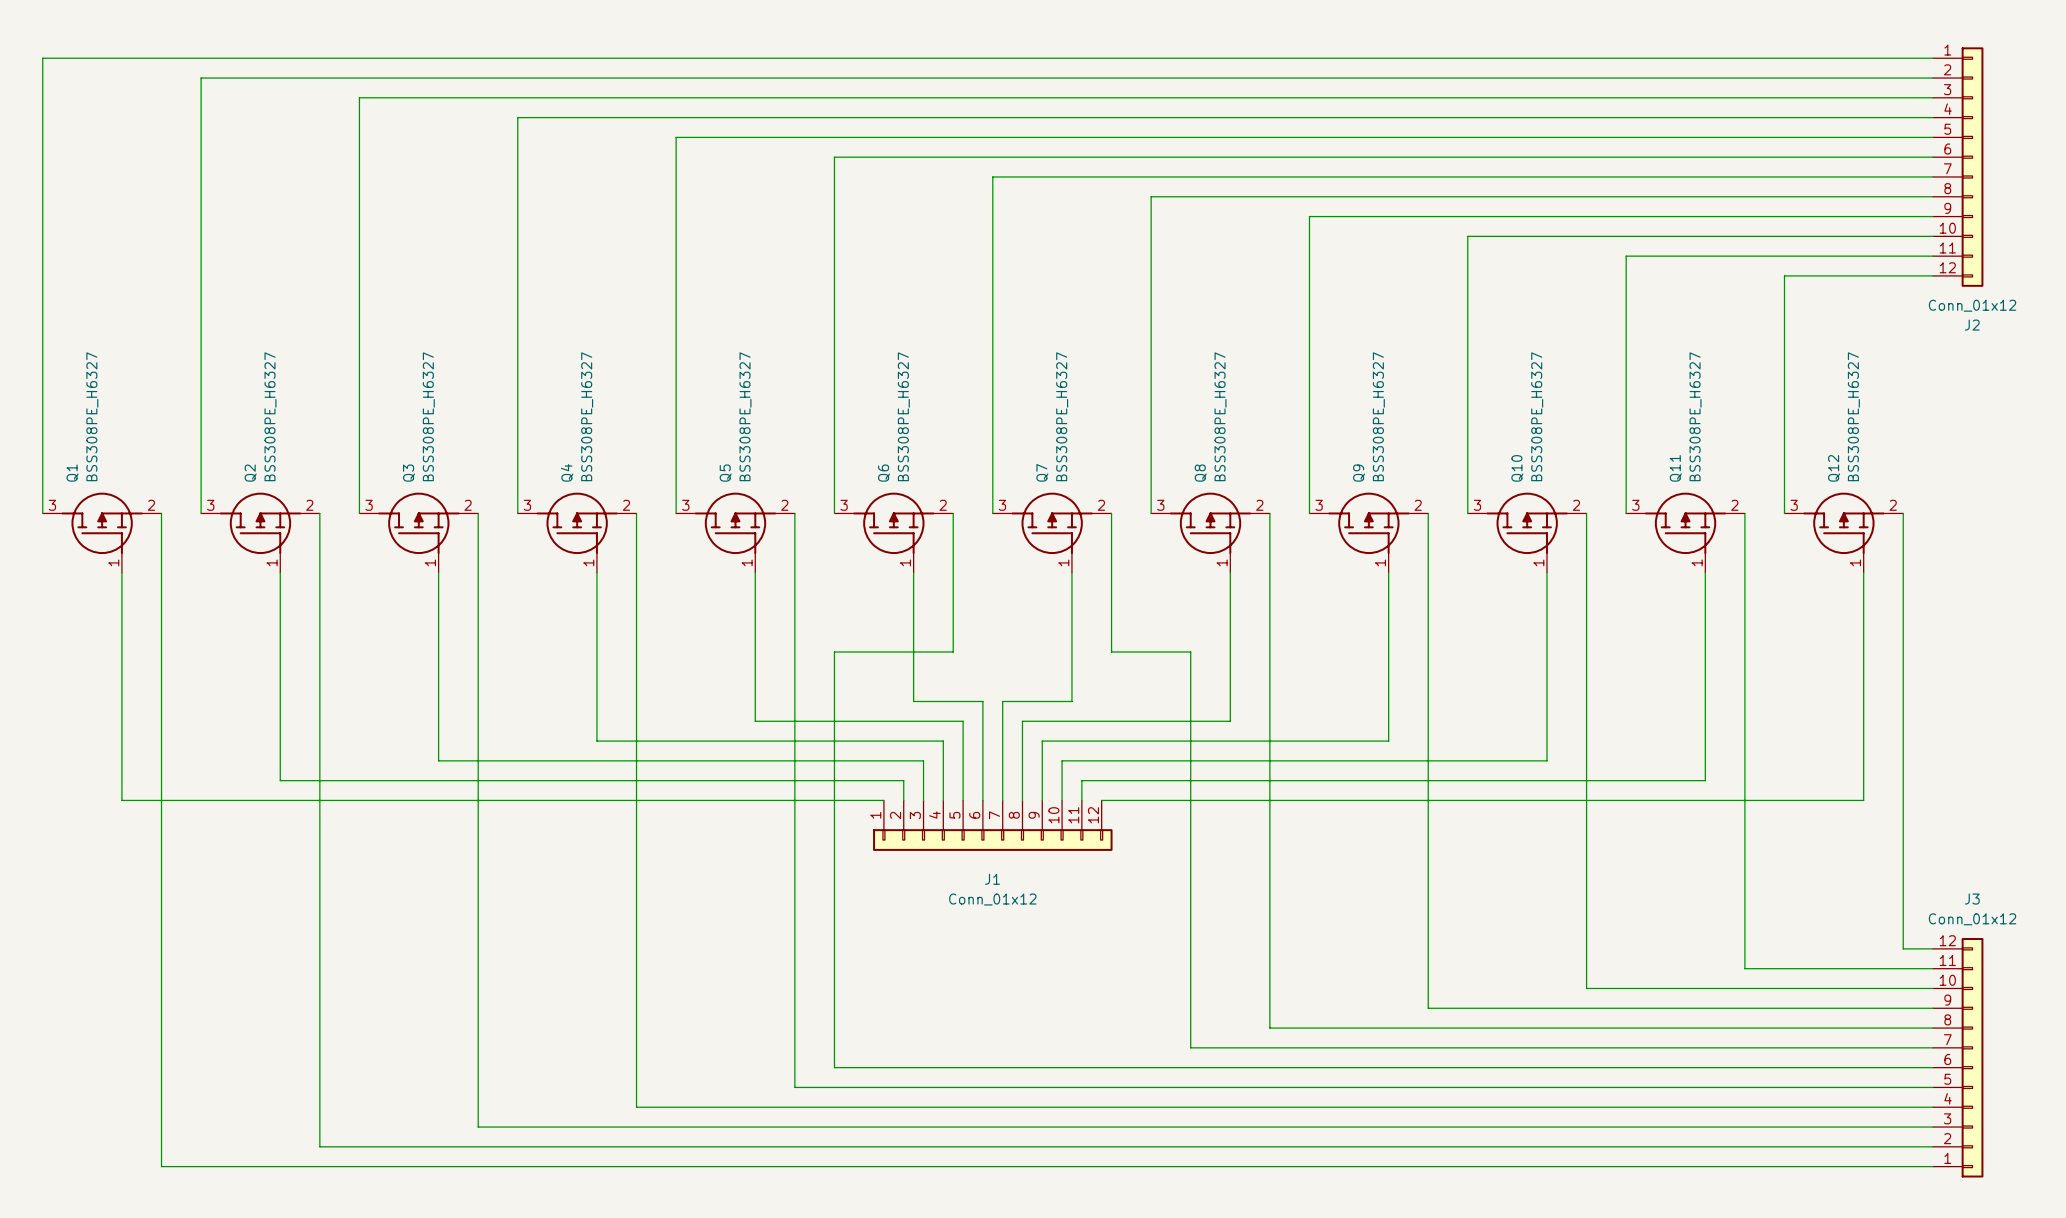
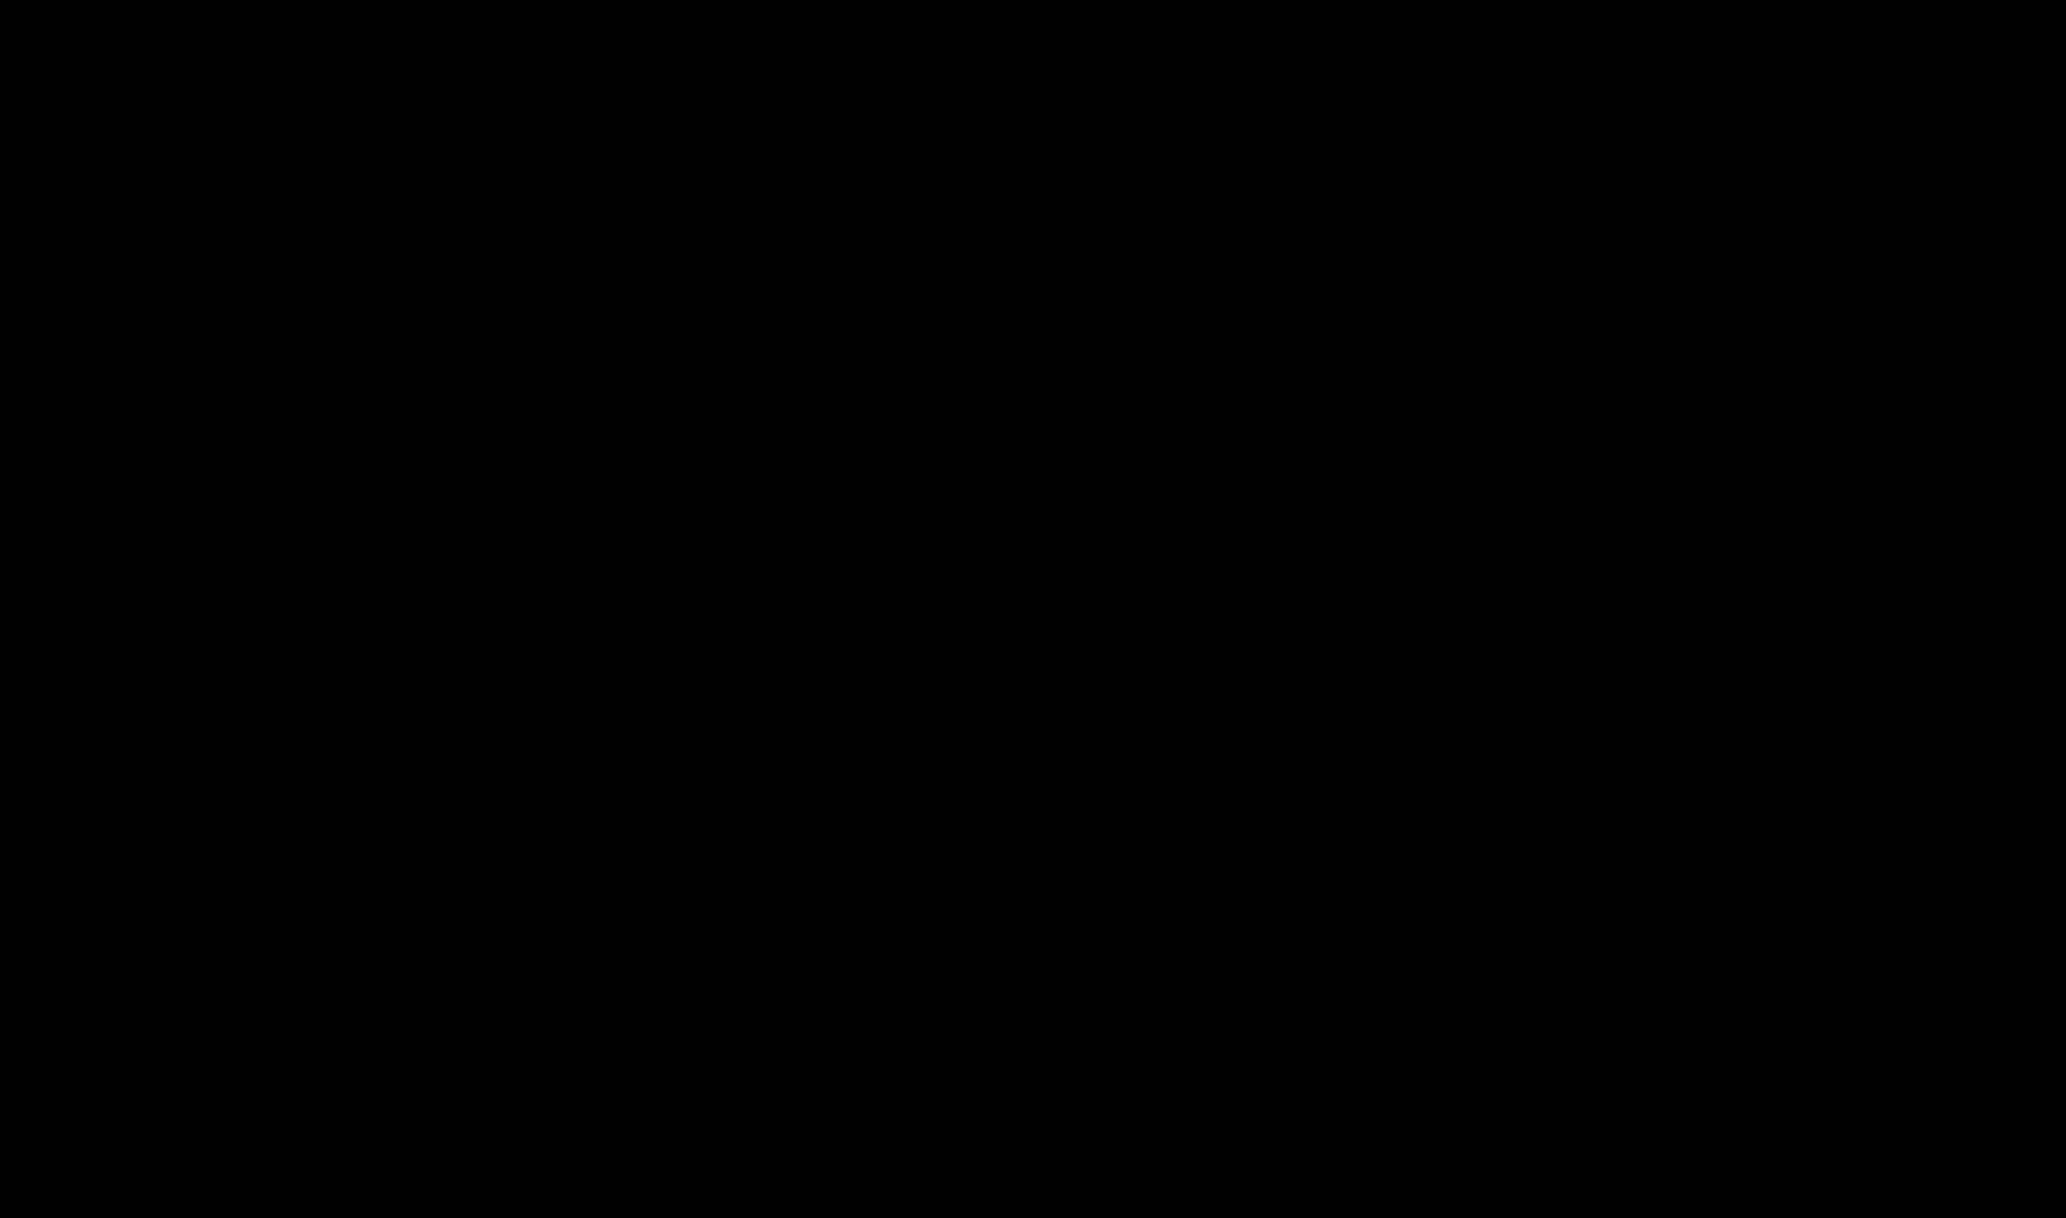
wire: (1932, 58) (42, 58) (42, 513) -> none
wire: (1932, 78) (201, 78) (201, 513) -> none
wire: (1932, 97) (359, 97) (359, 513) -> none
wire: (1932, 117) (517, 117) (517, 513) -> none
wire: (1932, 137) (676, 137) (676, 513) -> none
wire: (1932, 157) (834, 157) (834, 513) -> none
J2: Conn_01x12 (1958, 167) -> none
wire: (1932, 176) (992, 176) (992, 513) -> none
wire: (1932, 196) (1151, 196) (1151, 513) -> none
wire: (1932, 216) (1309, 216) (1309, 513) -> none
wire: (1932, 236) (1467, 236) (1467, 513) -> none
wire: (1932, 256) (1626, 256) (1626, 513) -> none
wire: (1932, 275) (1784, 275) (1784, 513) -> none
wire: (161, 513) (161, 1166) (1932, 1166) -> none
wire: (319, 513) (319, 1146) (1932, 1146) -> none
wire: (478, 513) (478, 1127) (1932, 1127) -> none
wire: (636, 513) (636, 1107) (1932, 1107) -> none
wire: (794, 513) (794, 1087) (1932, 1087) -> none
wire: (953, 513) (953, 652) (834, 652) (834, 1067) (1932, 1067) -> none
wire: (1111, 513) (1111, 652) (1190, 652) (1190, 1047) (1932, 1047) -> none
wire: (1269, 513) (1269, 1028) (1932, 1028) -> none
wire: (1428, 513) (1428, 1008) (1932, 1008) -> none
wire: (1586, 513) (1586, 988) (1932, 988) -> none
wire: (1744, 513) (1744, 968) (1932, 968) -> none
wire: (1903, 513) (1903, 948) (1932, 948) -> none
Q1: BSS308PE_H6327 (102, 532) -> none
Q2: BSS308PE_H6327 (260, 532) -> none
Q3: BSS308PE_H6327 (418, 532) -> none
Q4: BSS308PE_H6327 (577, 532) -> none
Q5: BSS308PE_H6327 (735, 532) -> none
Q6: BSS308PE_H6327 (893, 532) -> none
Q7: BSS308PE_H6327 (1052, 532) -> none
Q8: BSS308PE_H6327 (1210, 532) -> none
Q9: BSS308PE_H6327 (1368, 532) -> none
Q10: BSS308PE_H6327 (1527, 532) -> none
Q11: BSS308PE_H6327 (1685, 532) -> none
Q12: BSS308PE_H6327 (1843, 532) -> none
wire: (121, 572) (121, 800) (883, 800) -> none
wire: (280, 572) (280, 780) (903, 780) (903, 800) -> none
wire: (438, 572) (438, 760) (923, 760) (923, 800) -> none
wire: (596, 572) (596, 741) (943, 741) (943, 800) -> none
wire: (755, 572) (755, 721) (963, 721) (963, 800) -> none
wire: (913, 572) (913, 701) (982, 701) (982, 800) -> none
wire: (1071, 572) (1071, 701) (1002, 701) (1002, 800) -> none
wire: (1230, 572) (1230, 721) (1022, 721) (1022, 800) -> none
wire: (1388, 572) (1388, 741) (1042, 741) (1042, 800) -> none
wire: (1546, 572) (1546, 760) (1062, 760) (1062, 800) -> none
wire: (1705, 572) (1705, 780) (1081, 780) (1081, 800) -> none
wire: (1863, 572) (1863, 800) (1101, 800) -> none
J1: Conn_01x12 (992, 825) -> none
J3: Conn_01x12 (1958, 1057) -> none

